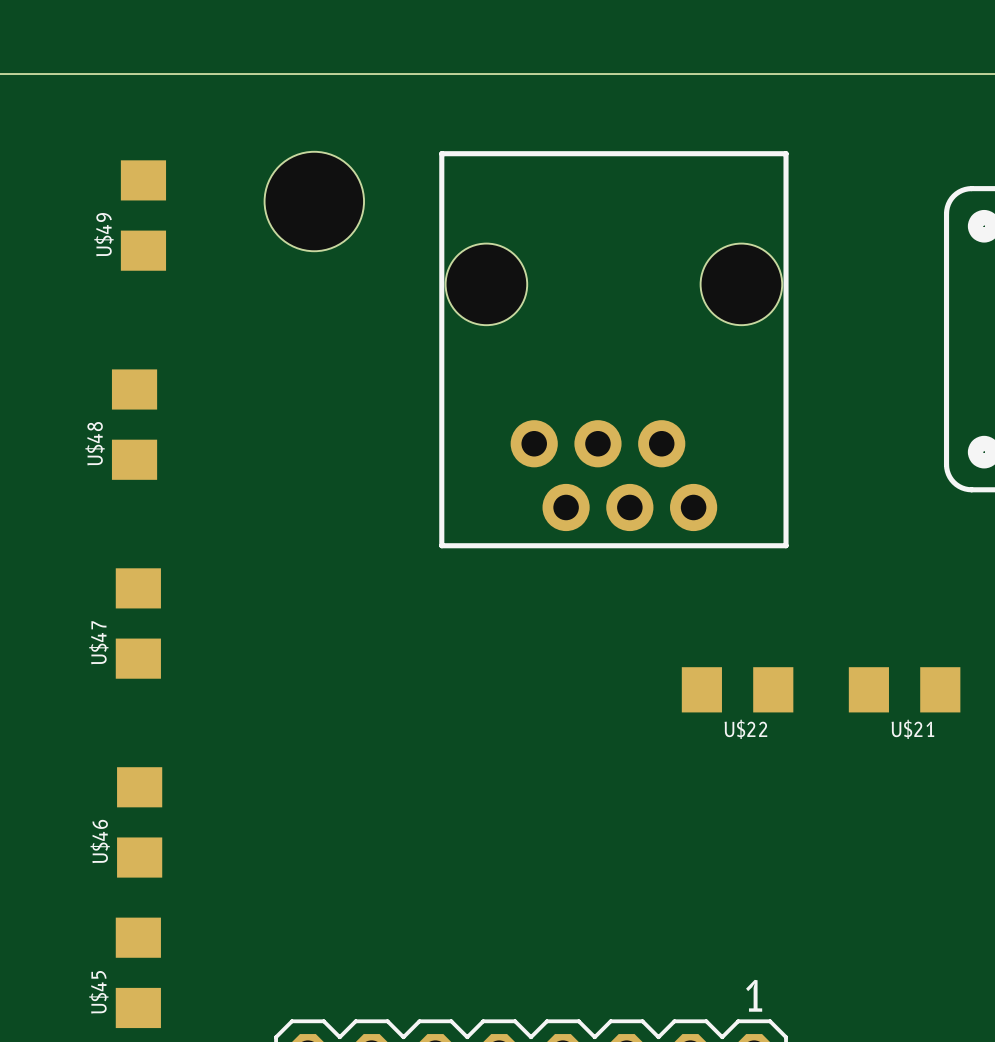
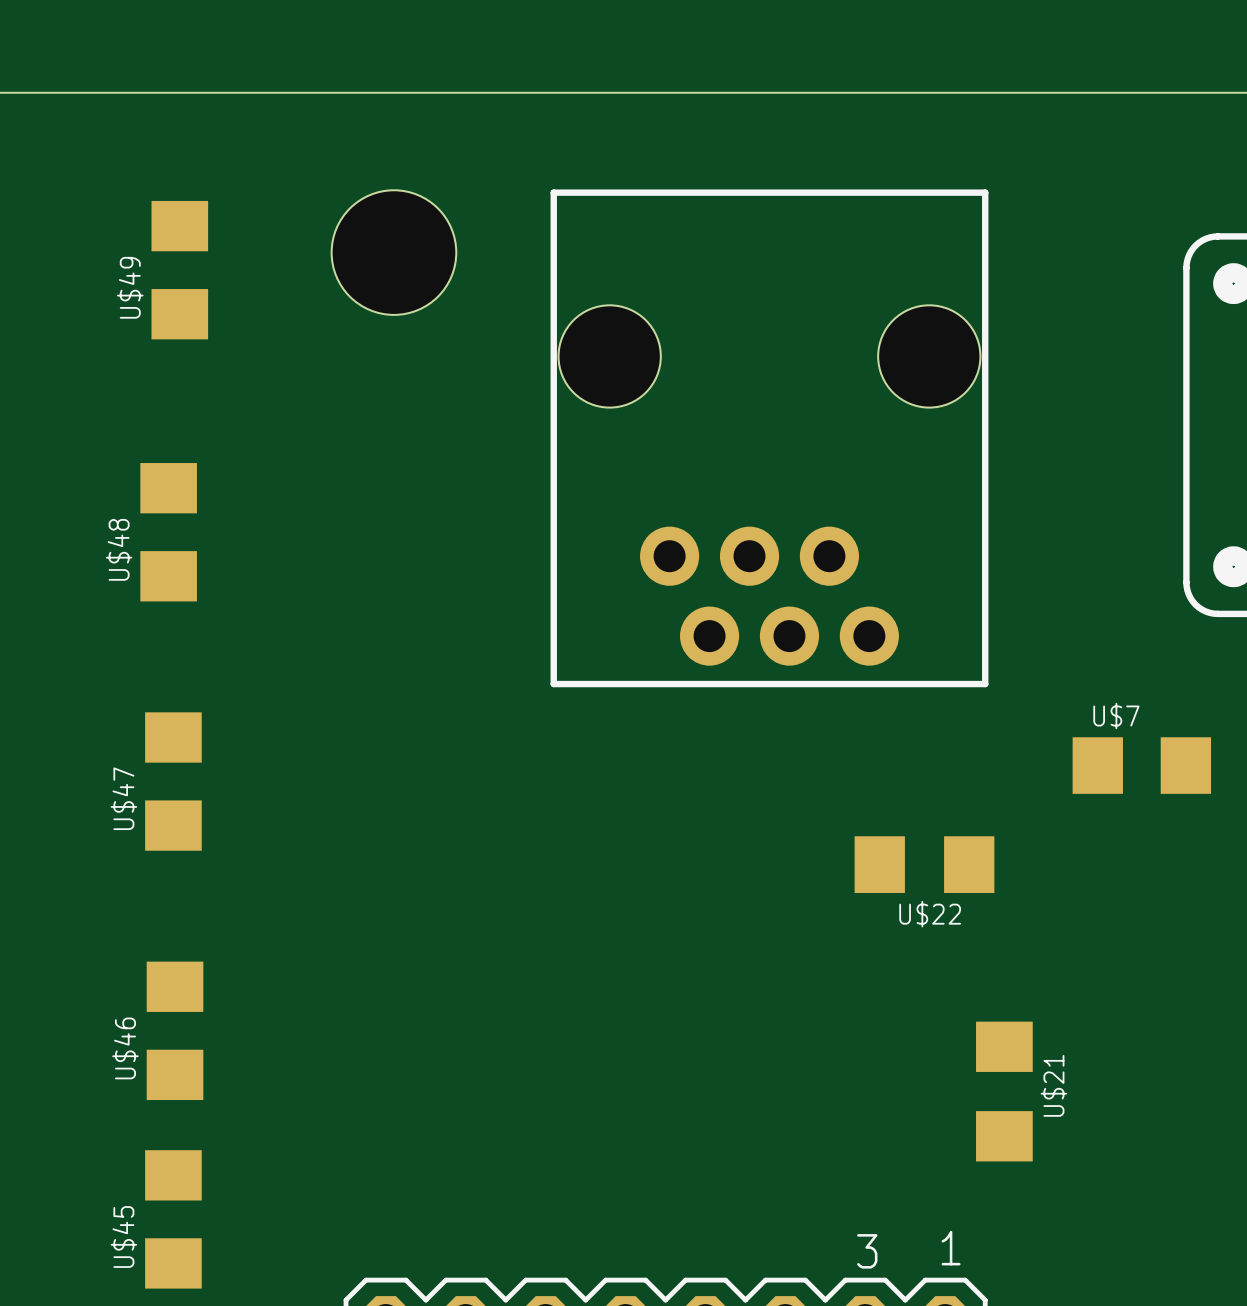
U$7: none -> (1141, 765)
U$21 rotation: 0° (904, 689) -> 90° clockwise (1004, 1091)
U$21 position: (904, 689) -> (1004, 1091)
U$21 name position: U$21 (912, 729) -> U$21 (1053, 1085)
part text: 1 (754, 995) -> none
text: none -> 1 (951, 1248)
text: none -> 3 (867, 1251)

